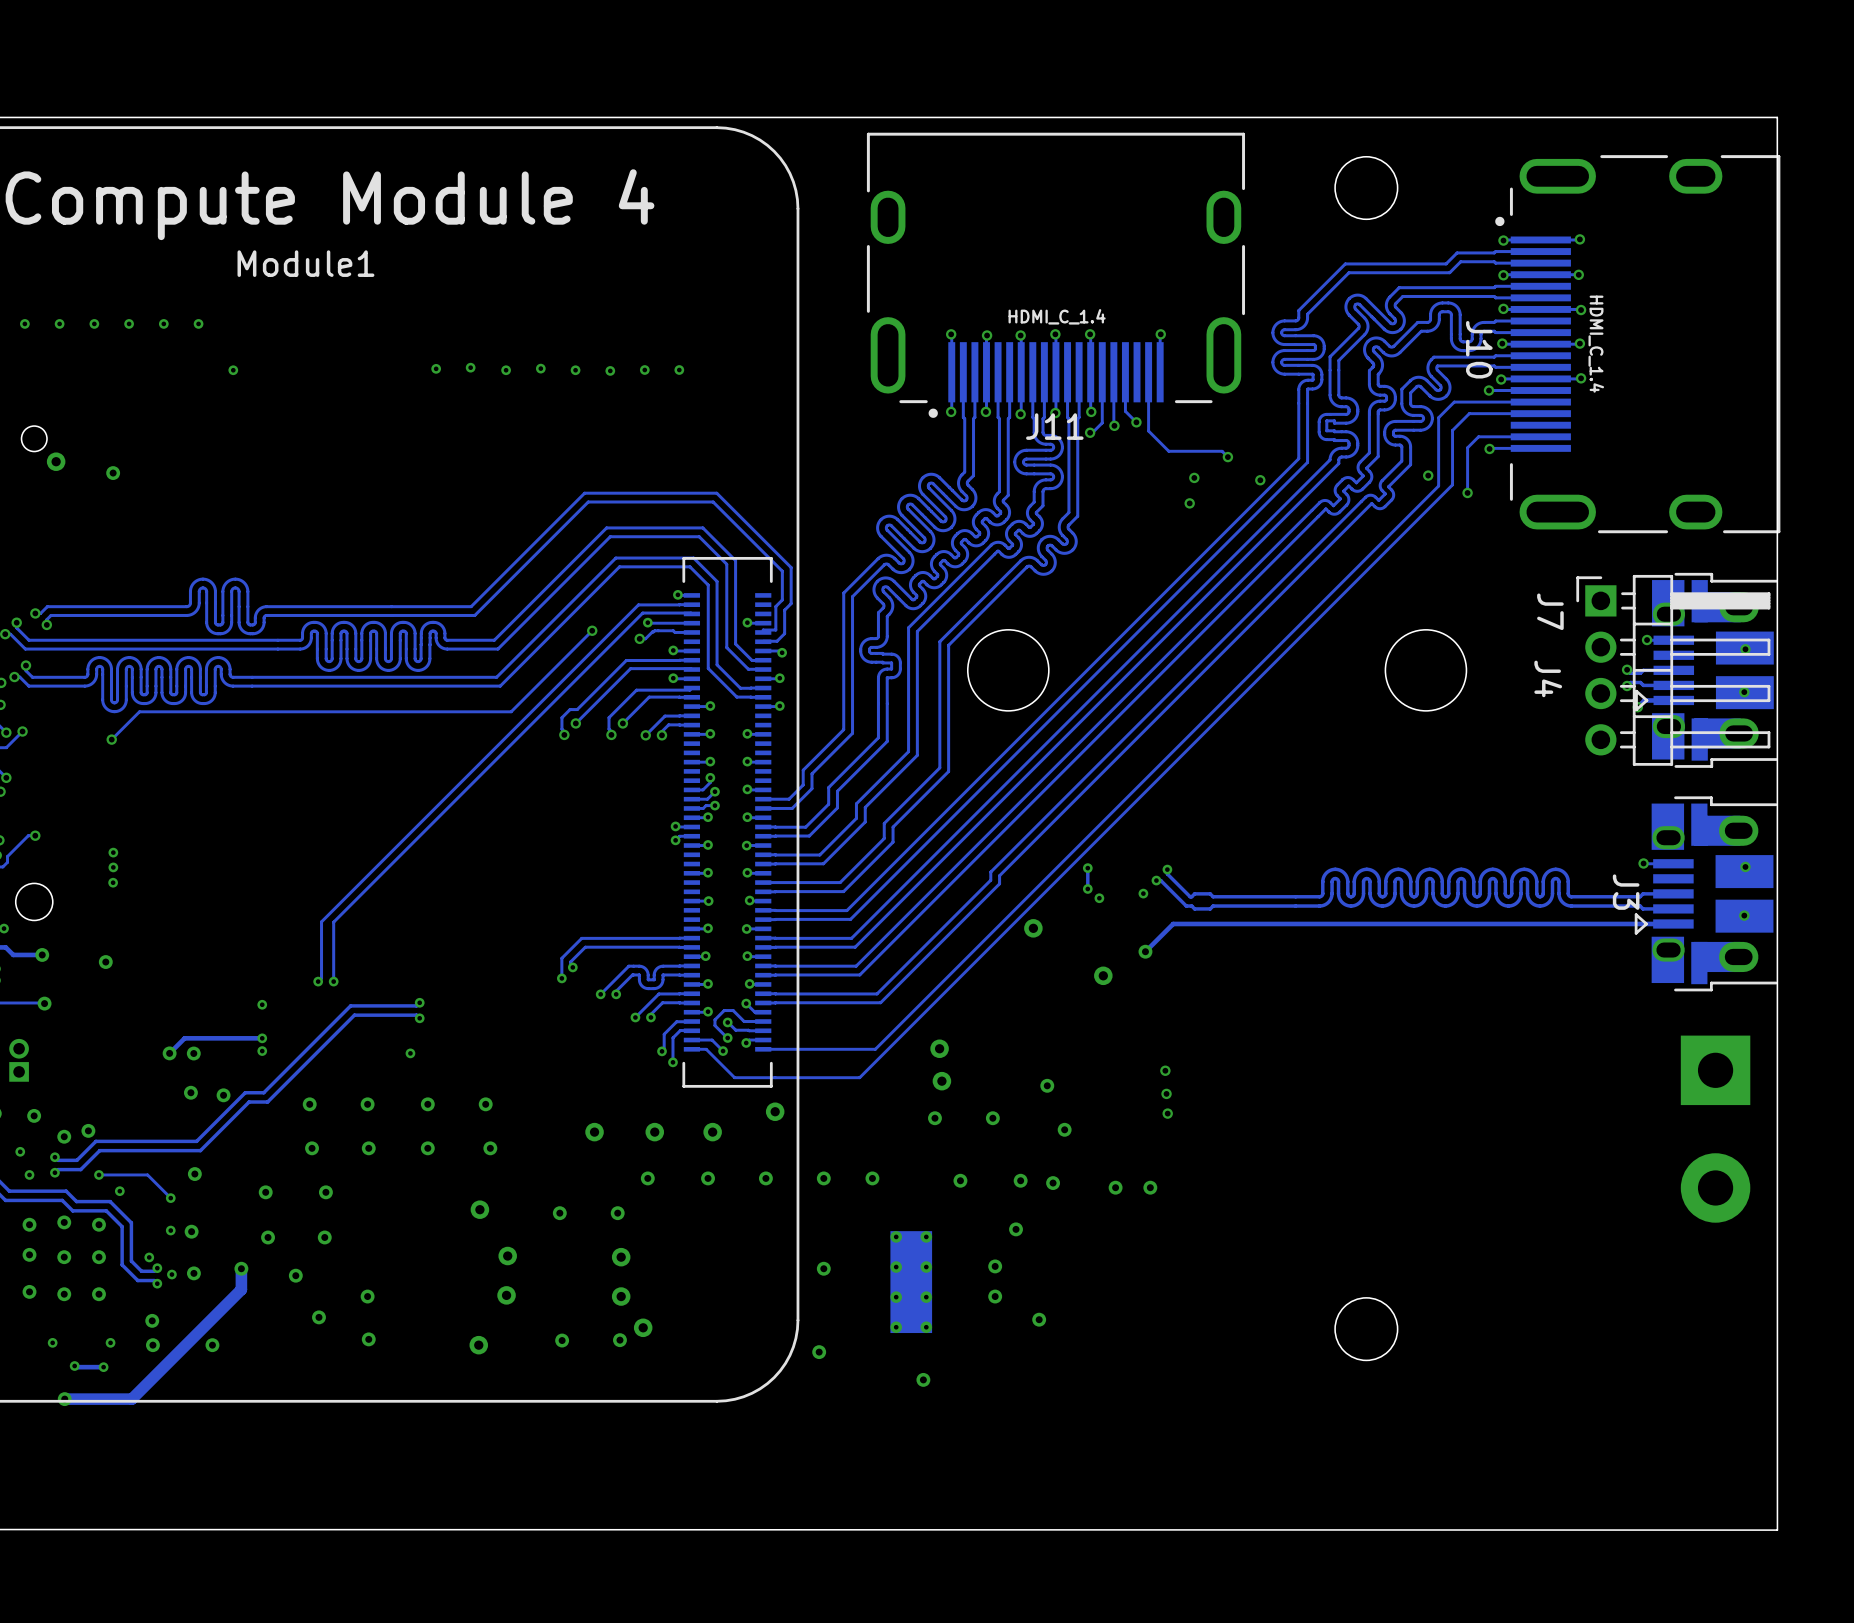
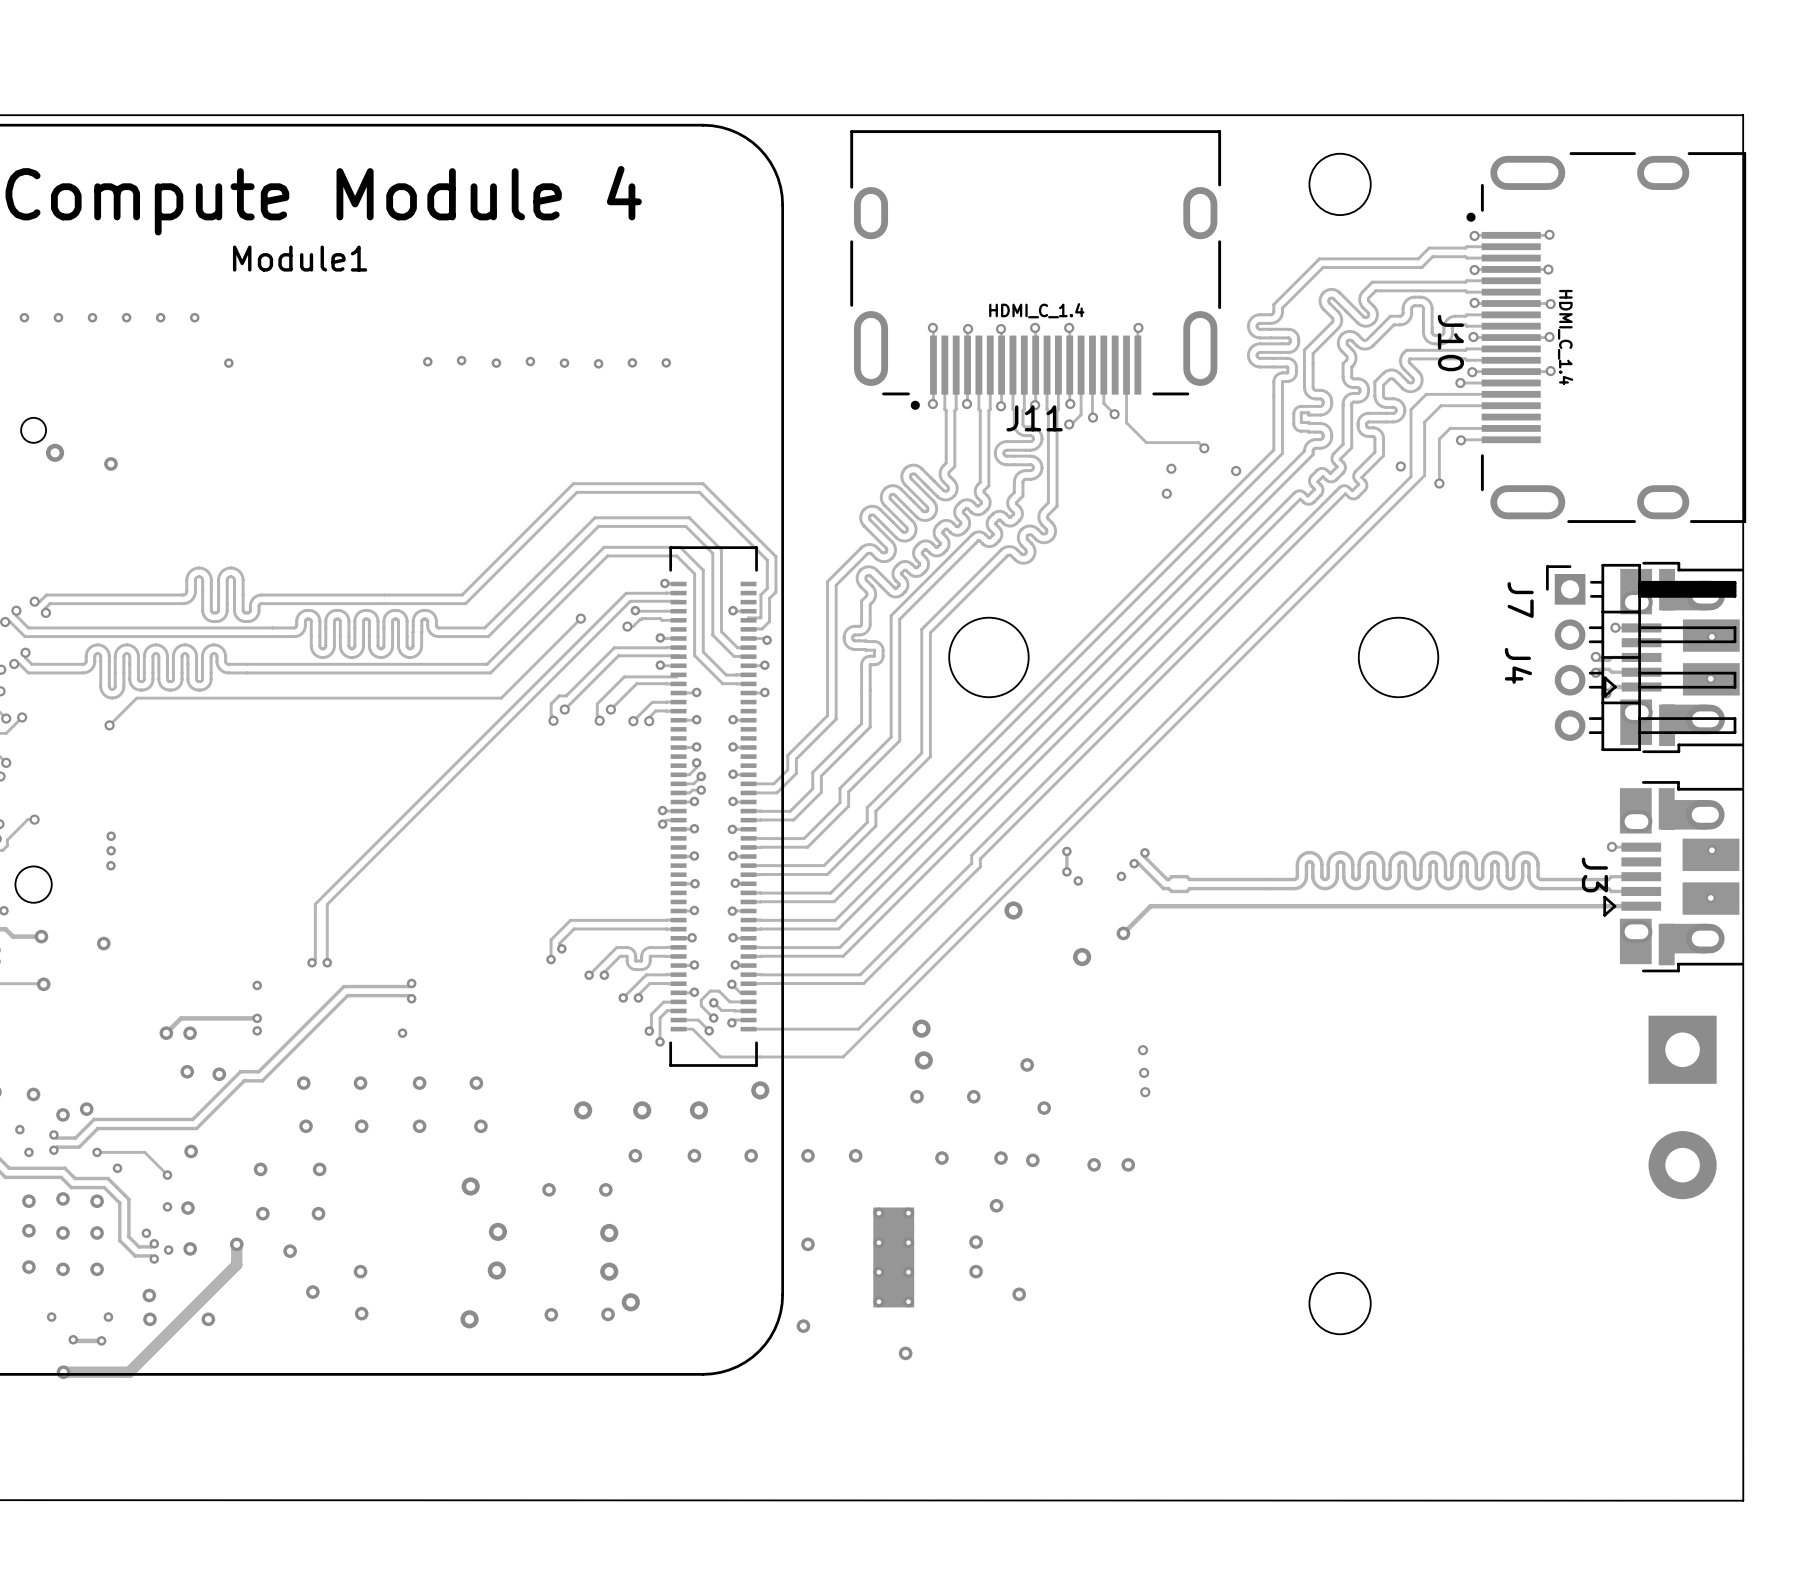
part: (19, 1060) -> none

